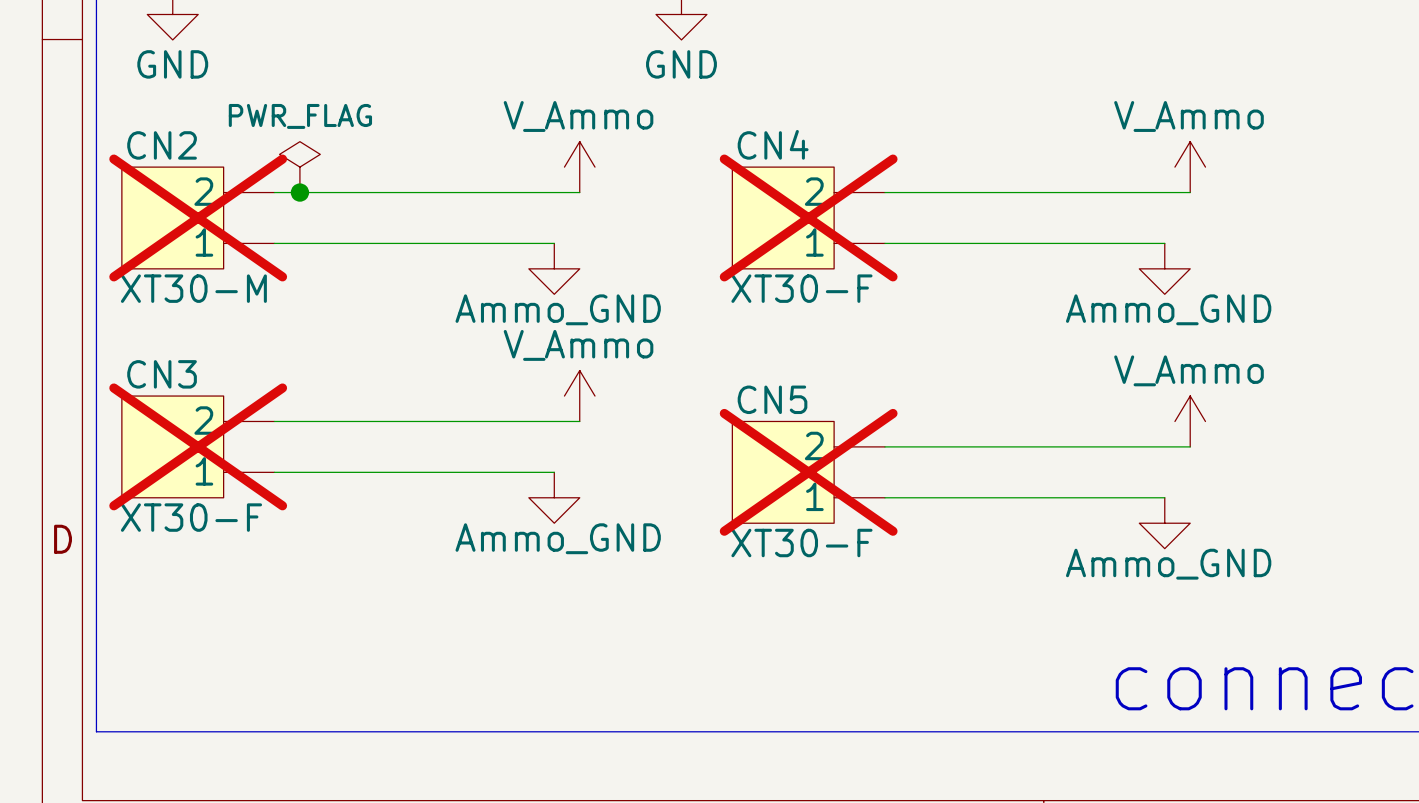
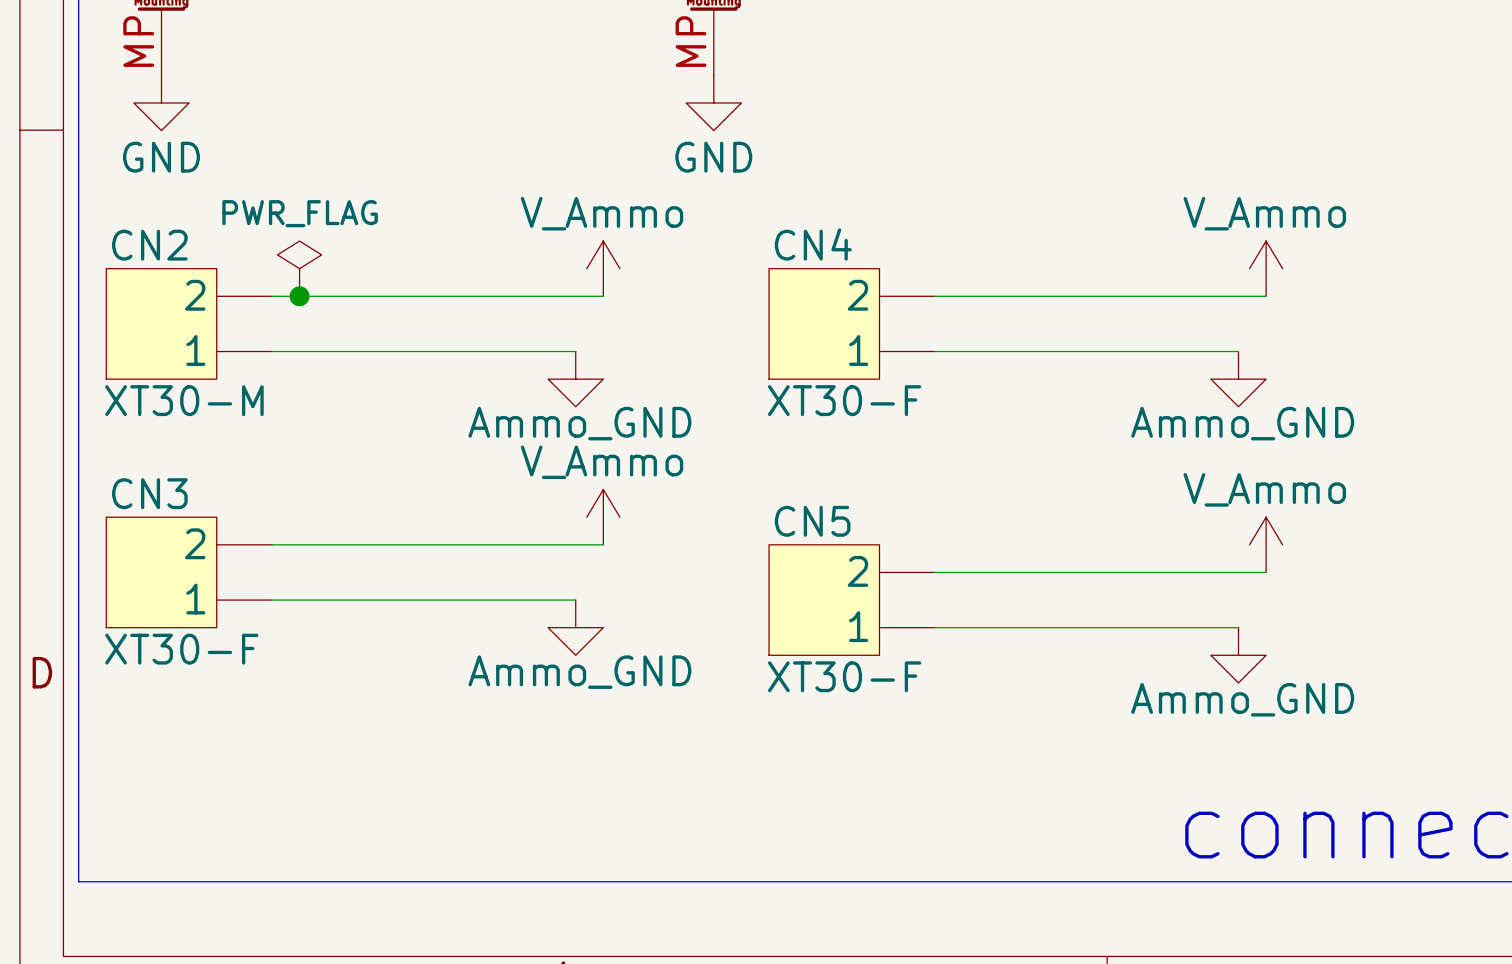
CN2 do-not-place cross: (198, 217) -> none
CN4 do-not-place cross: (808, 217) -> none
CN3 do-not-place cross: (198, 446) -> none
CN5 do-not-place cross: (808, 472) -> none

